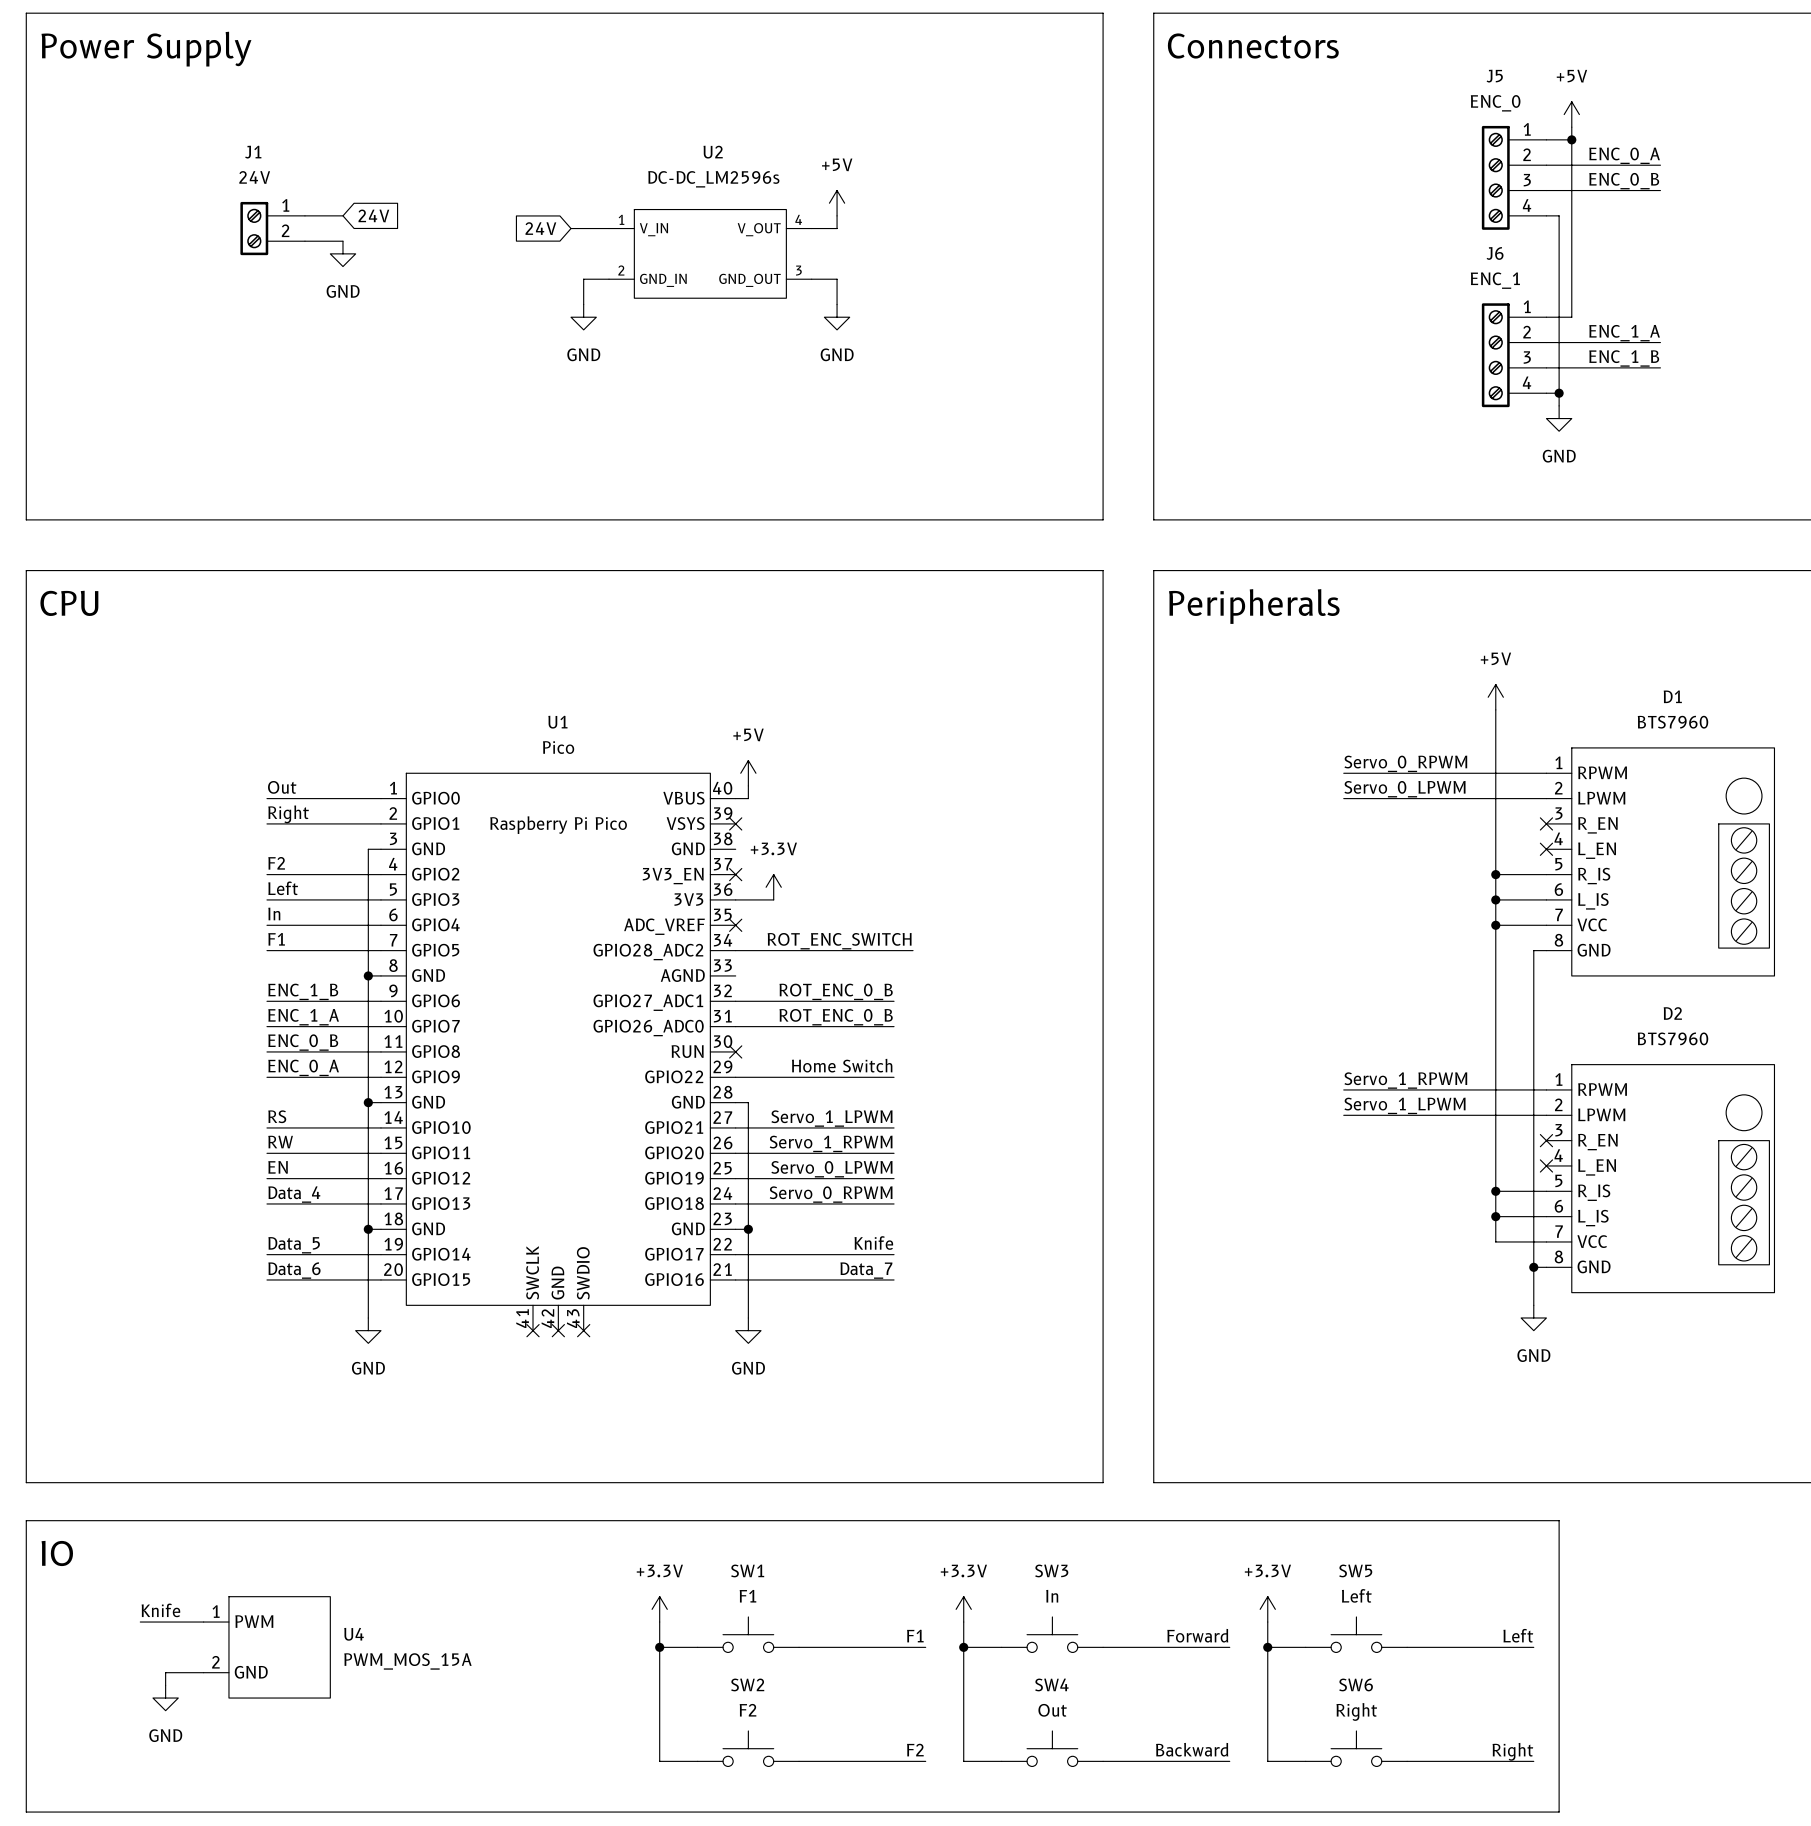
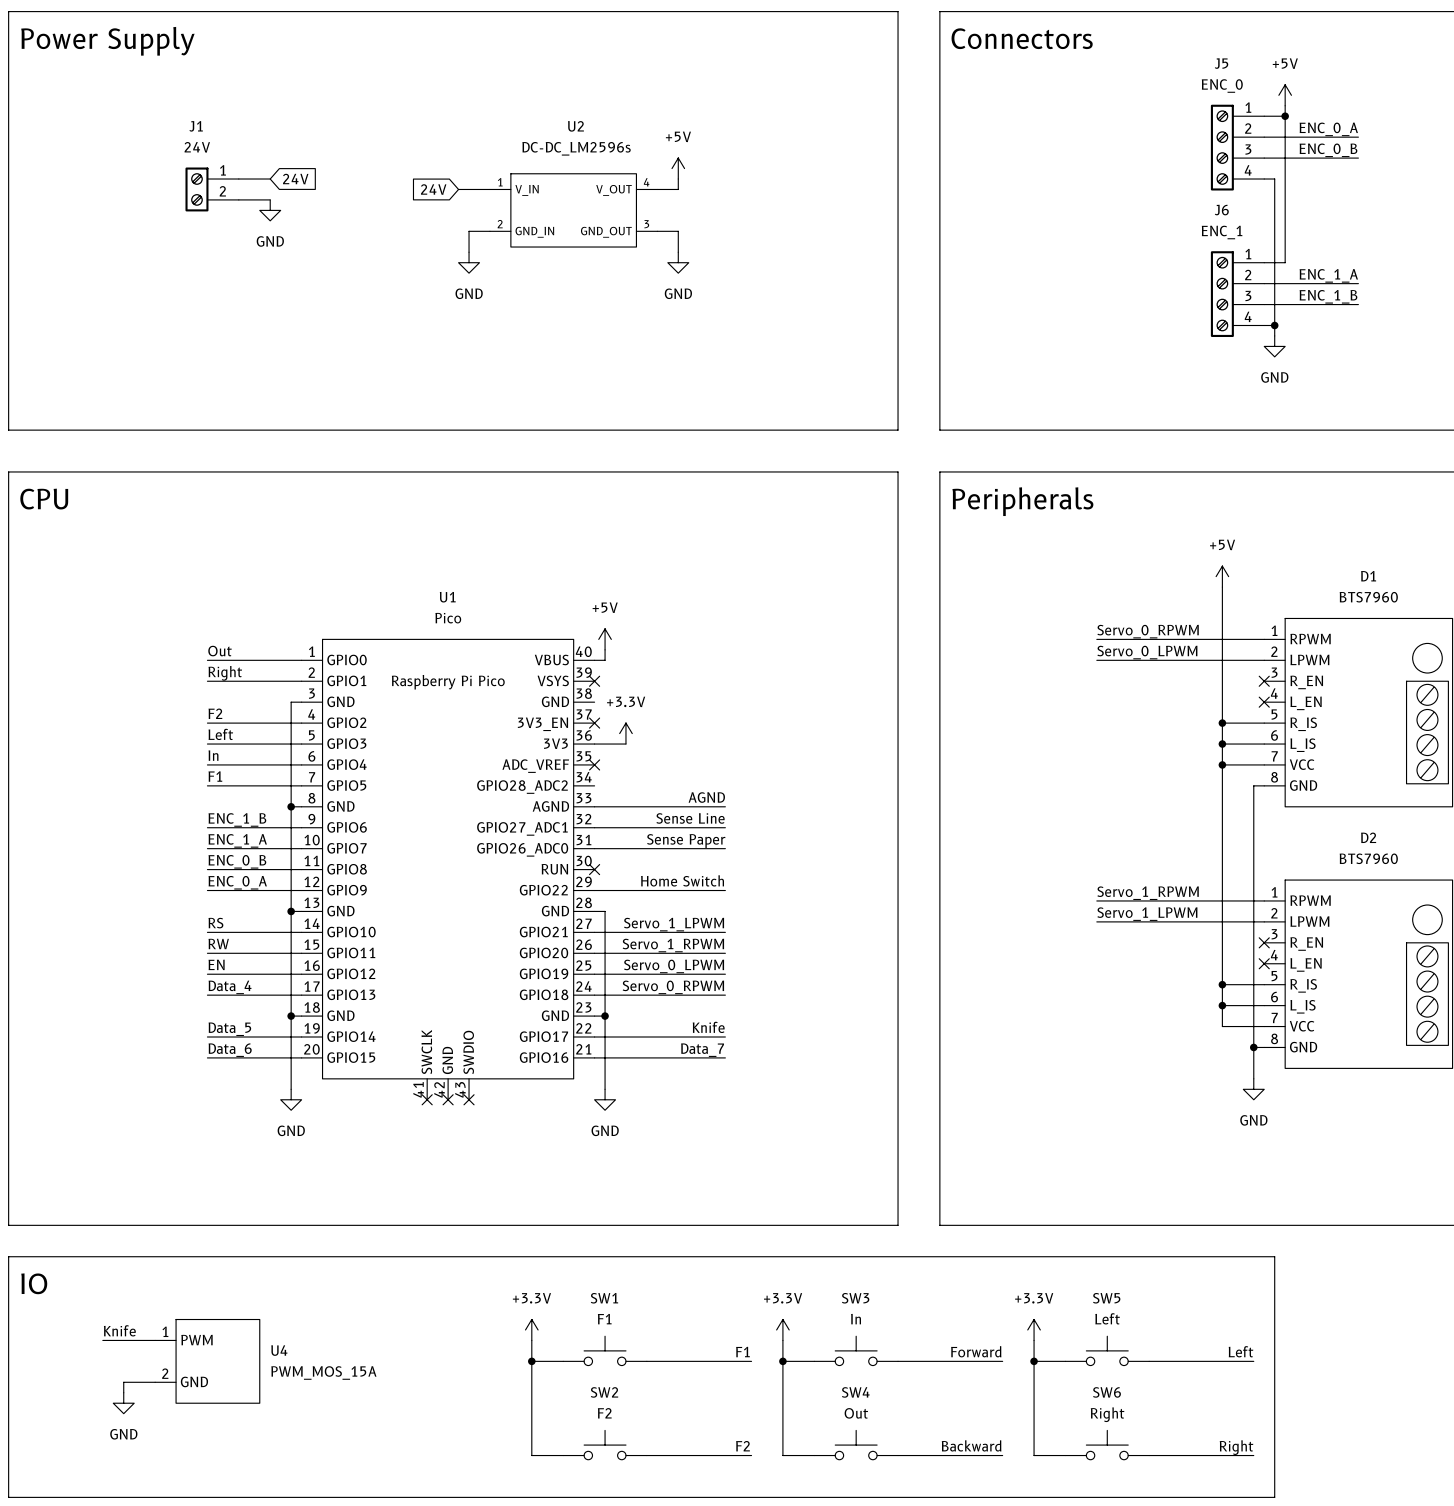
label: ROT_ENC_SWITCH (839, 941) -> none
wire: (735, 950) (913, 950) -> none
label: none -> AGND (706, 797)
wire: none -> (594, 806) (725, 806)
label: ROT_ENC_0_B (836, 991) -> Sense Line (690, 818)
label: ROT_ENC_0_B (836, 1017) -> Sense Paper (686, 841)

